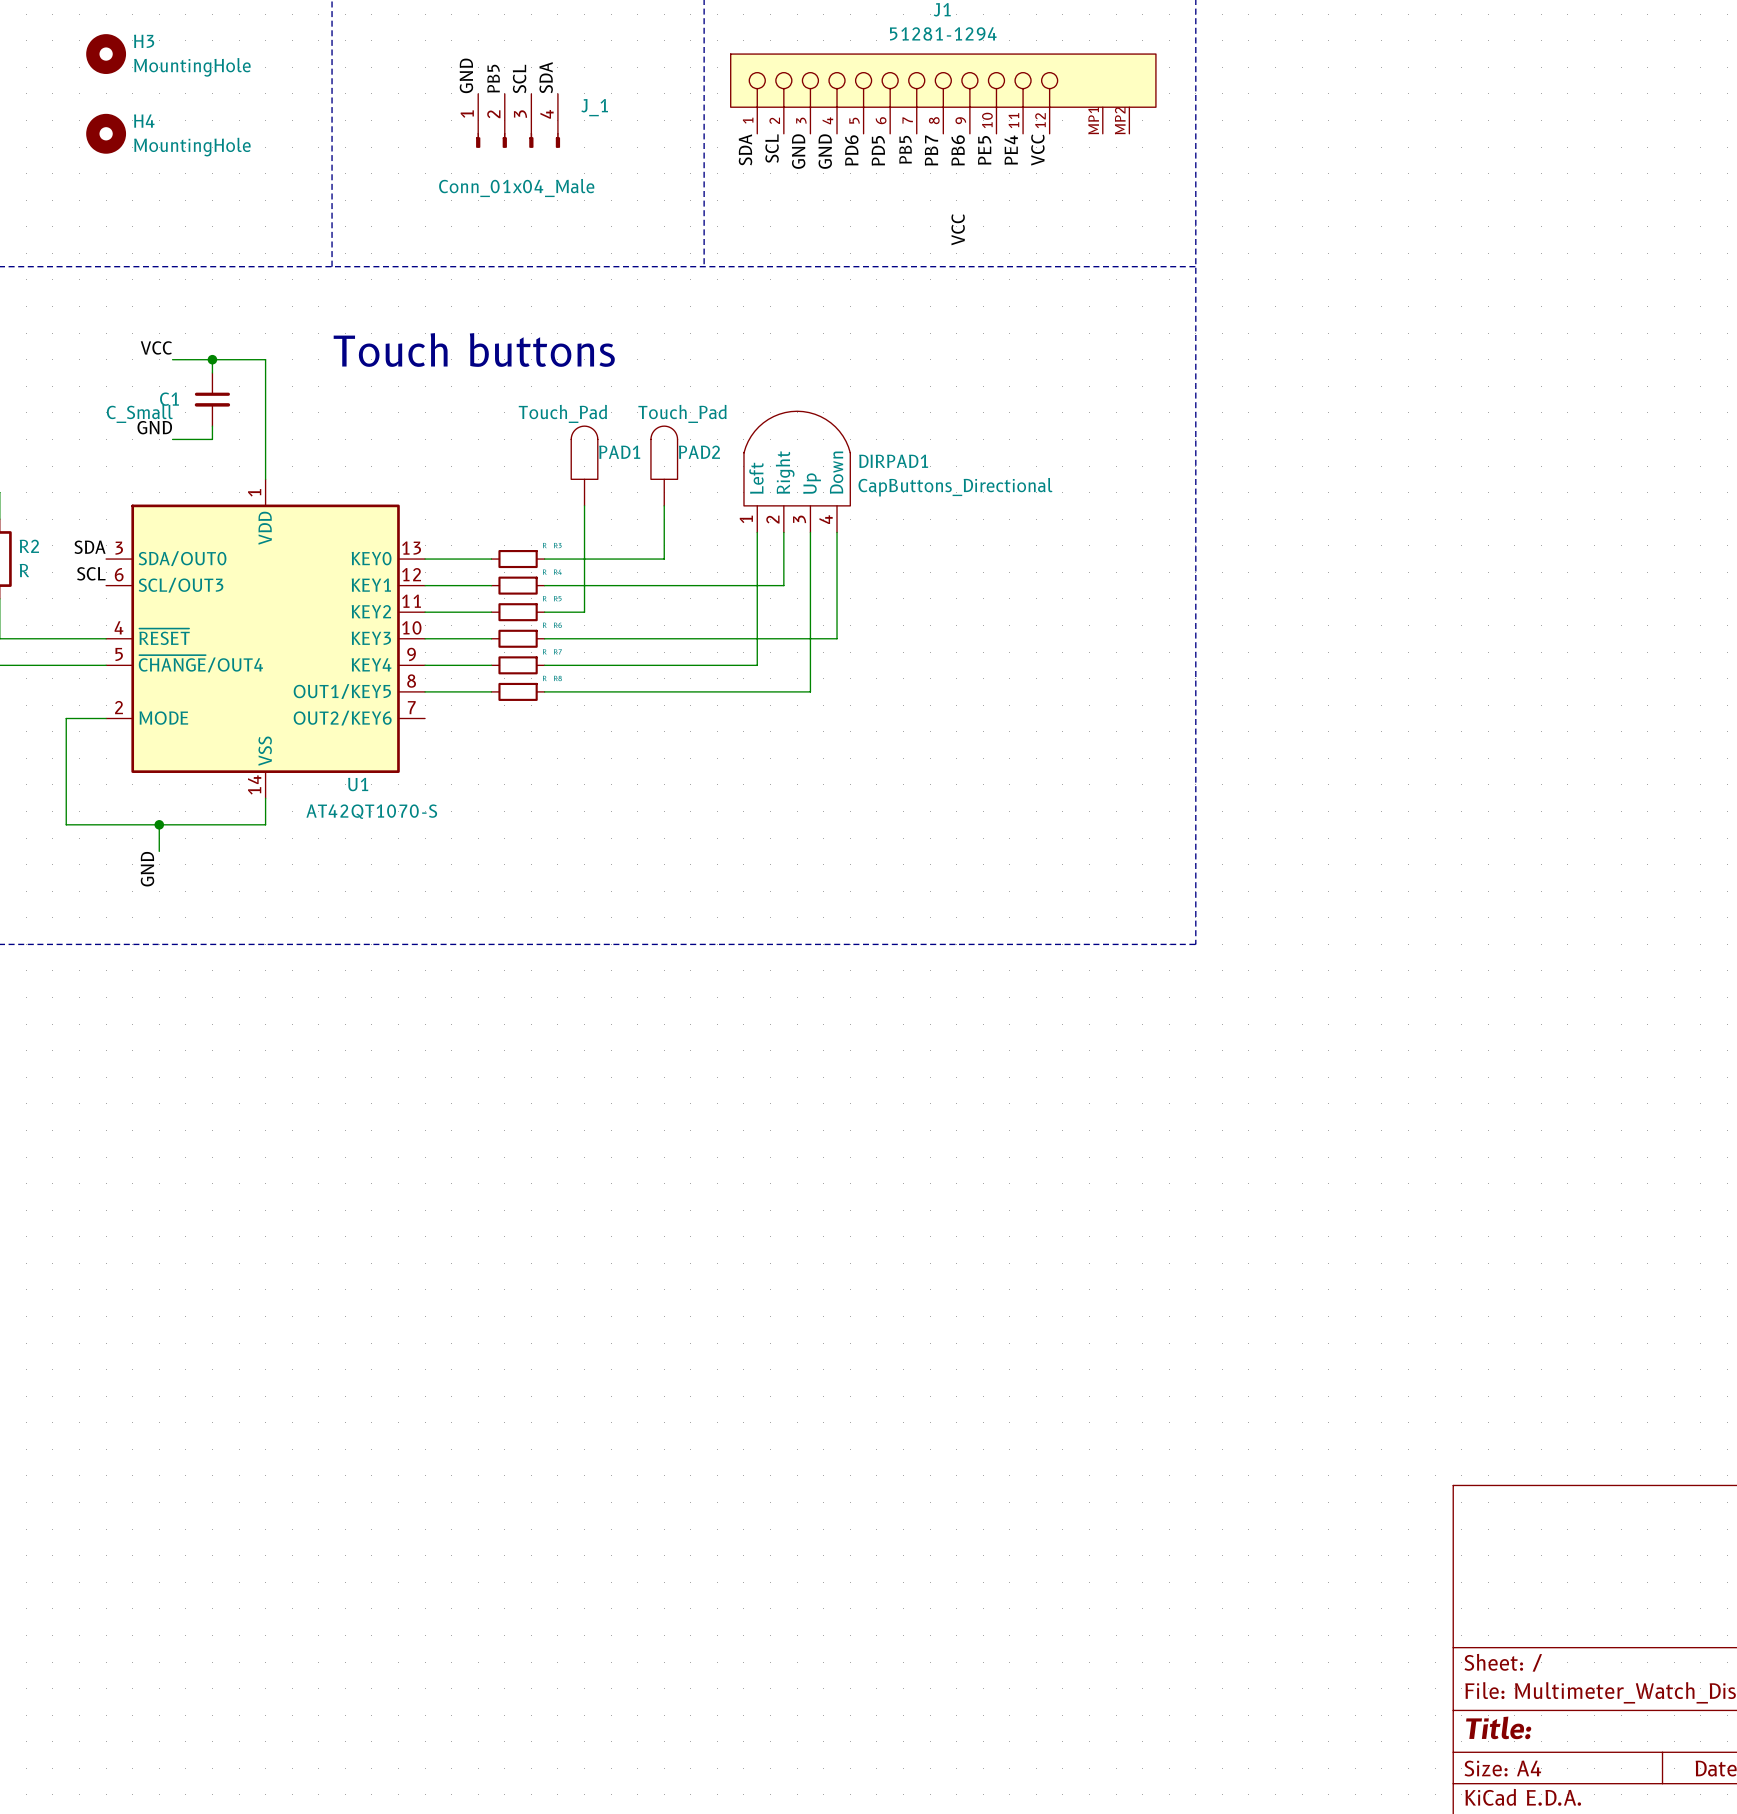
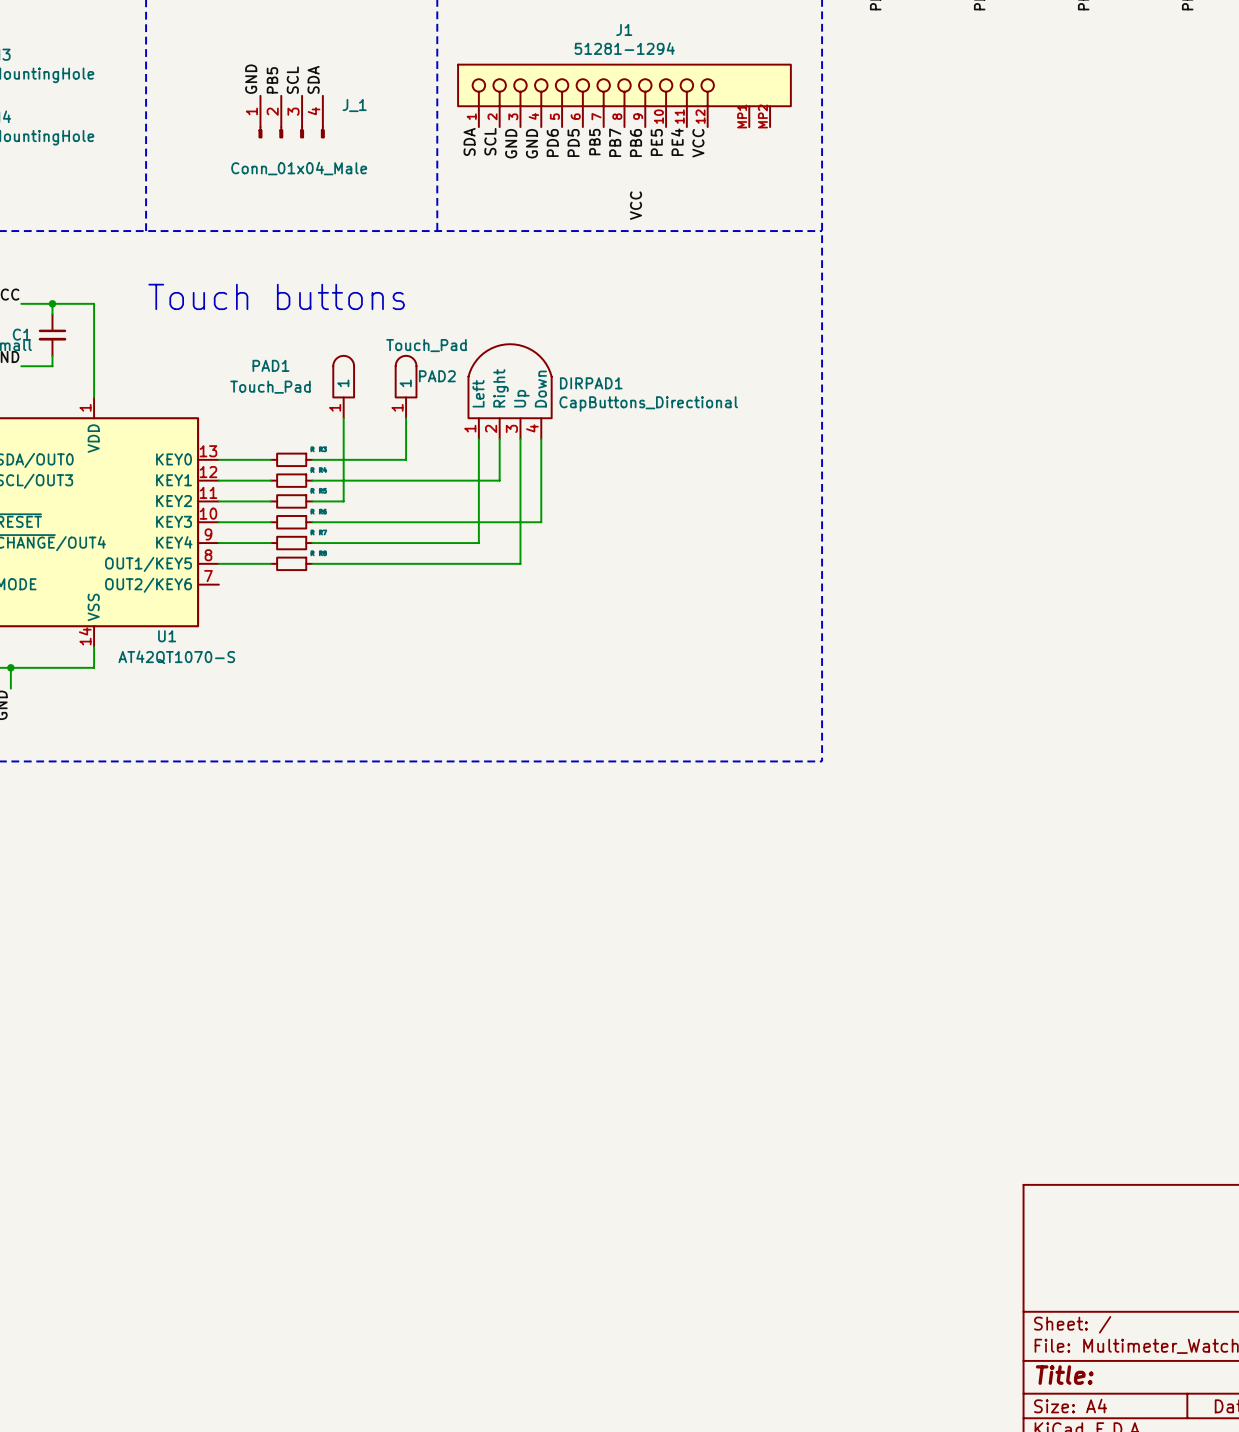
PAD1 value position: Touch_Pad (562, 413) -> Touch_Pad (270, 387)
PAD1 name position: PAD1 (619, 452) -> PAD1 (270, 365)
PAD1 pin name: none -> 1 (343, 383)
PAD2 pin name: none -> 1 (405, 383)
PAD1 pin number: none -> 1 (335, 407)
PAD2 pin number: none -> 1 (397, 407)

